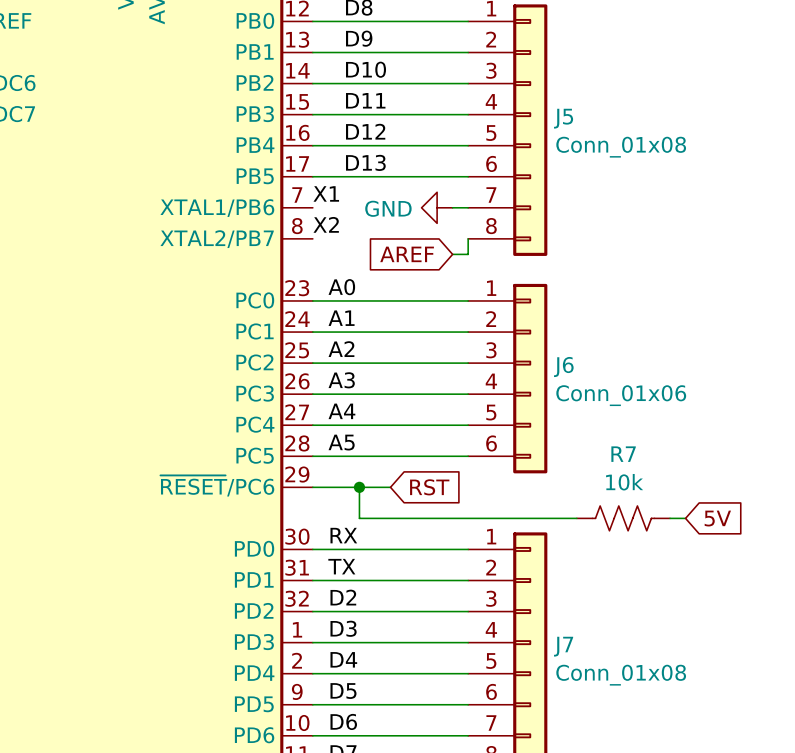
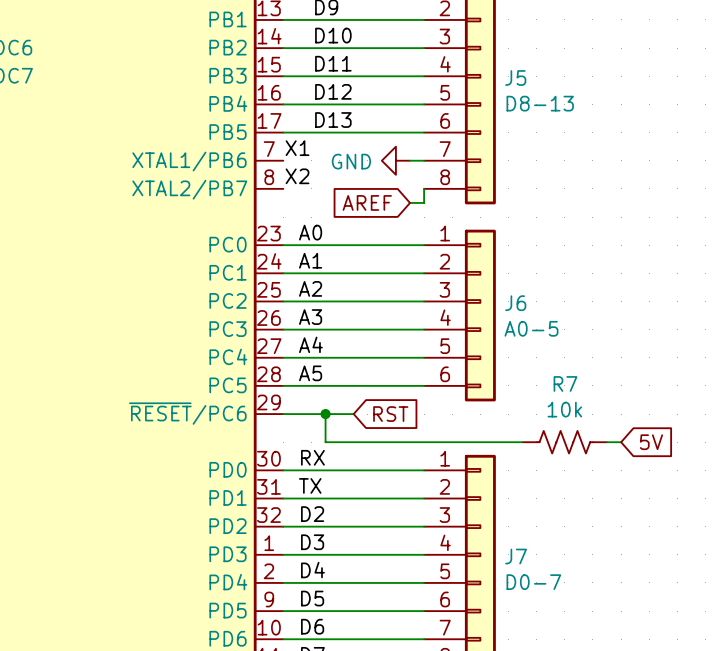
J5 value: Conn_01x08 (621, 147) -> D8-13 (540, 103)
J6 value: Conn_01x06 (621, 395) -> A0-5 (531, 328)
J7 value: Conn_01x08 (621, 675) -> D0-7 (533, 582)

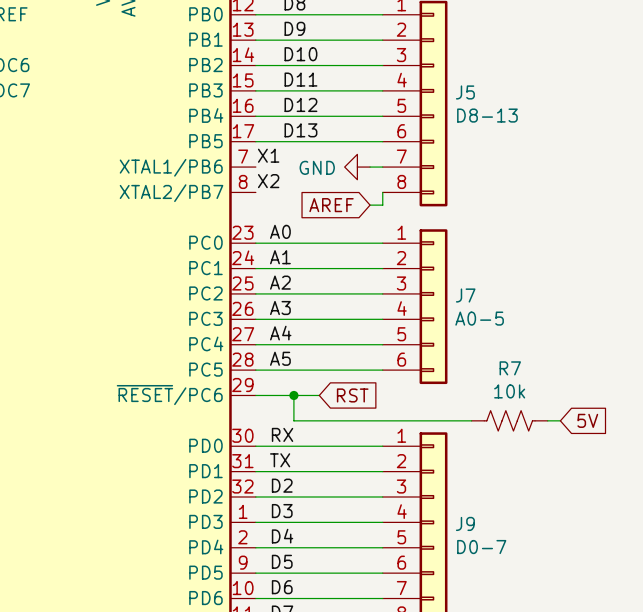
J6 name: J6 (515, 303) -> J7 (465, 295)
J7 name: J7 (516, 556) -> J9 (465, 523)

